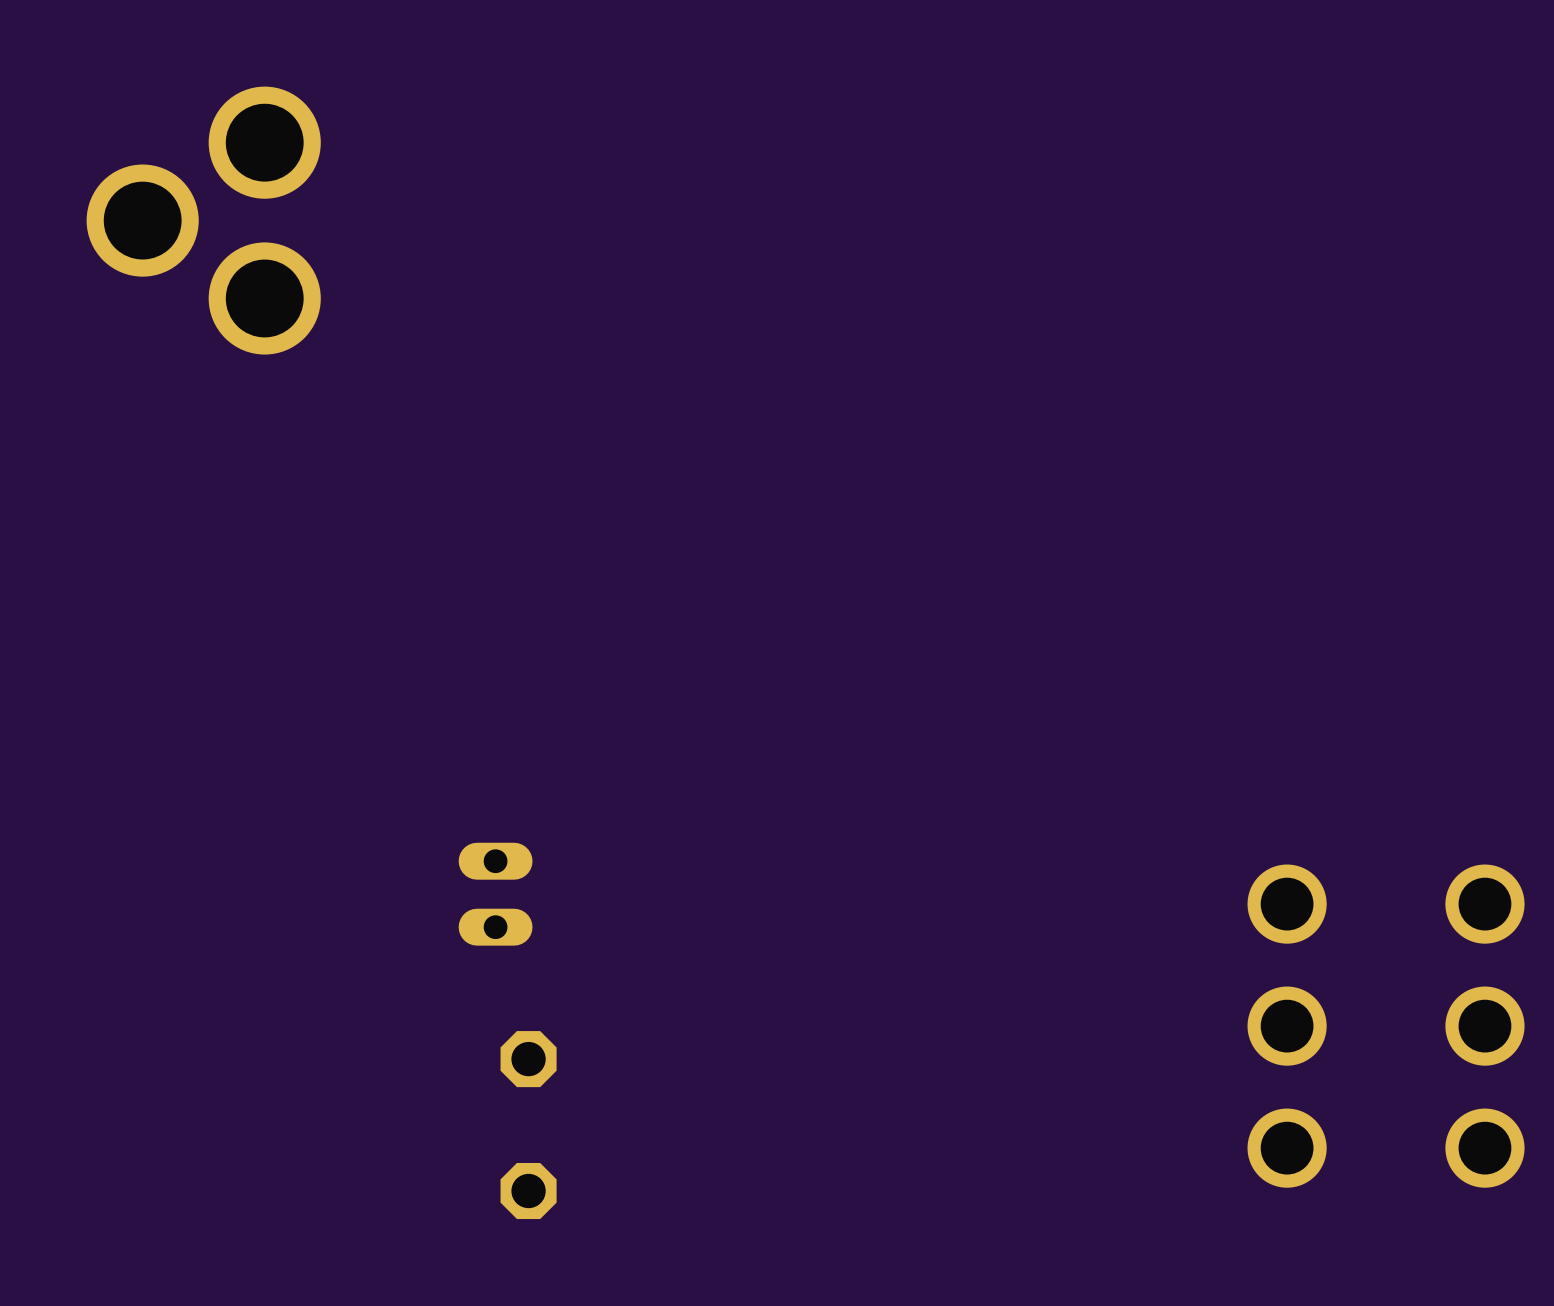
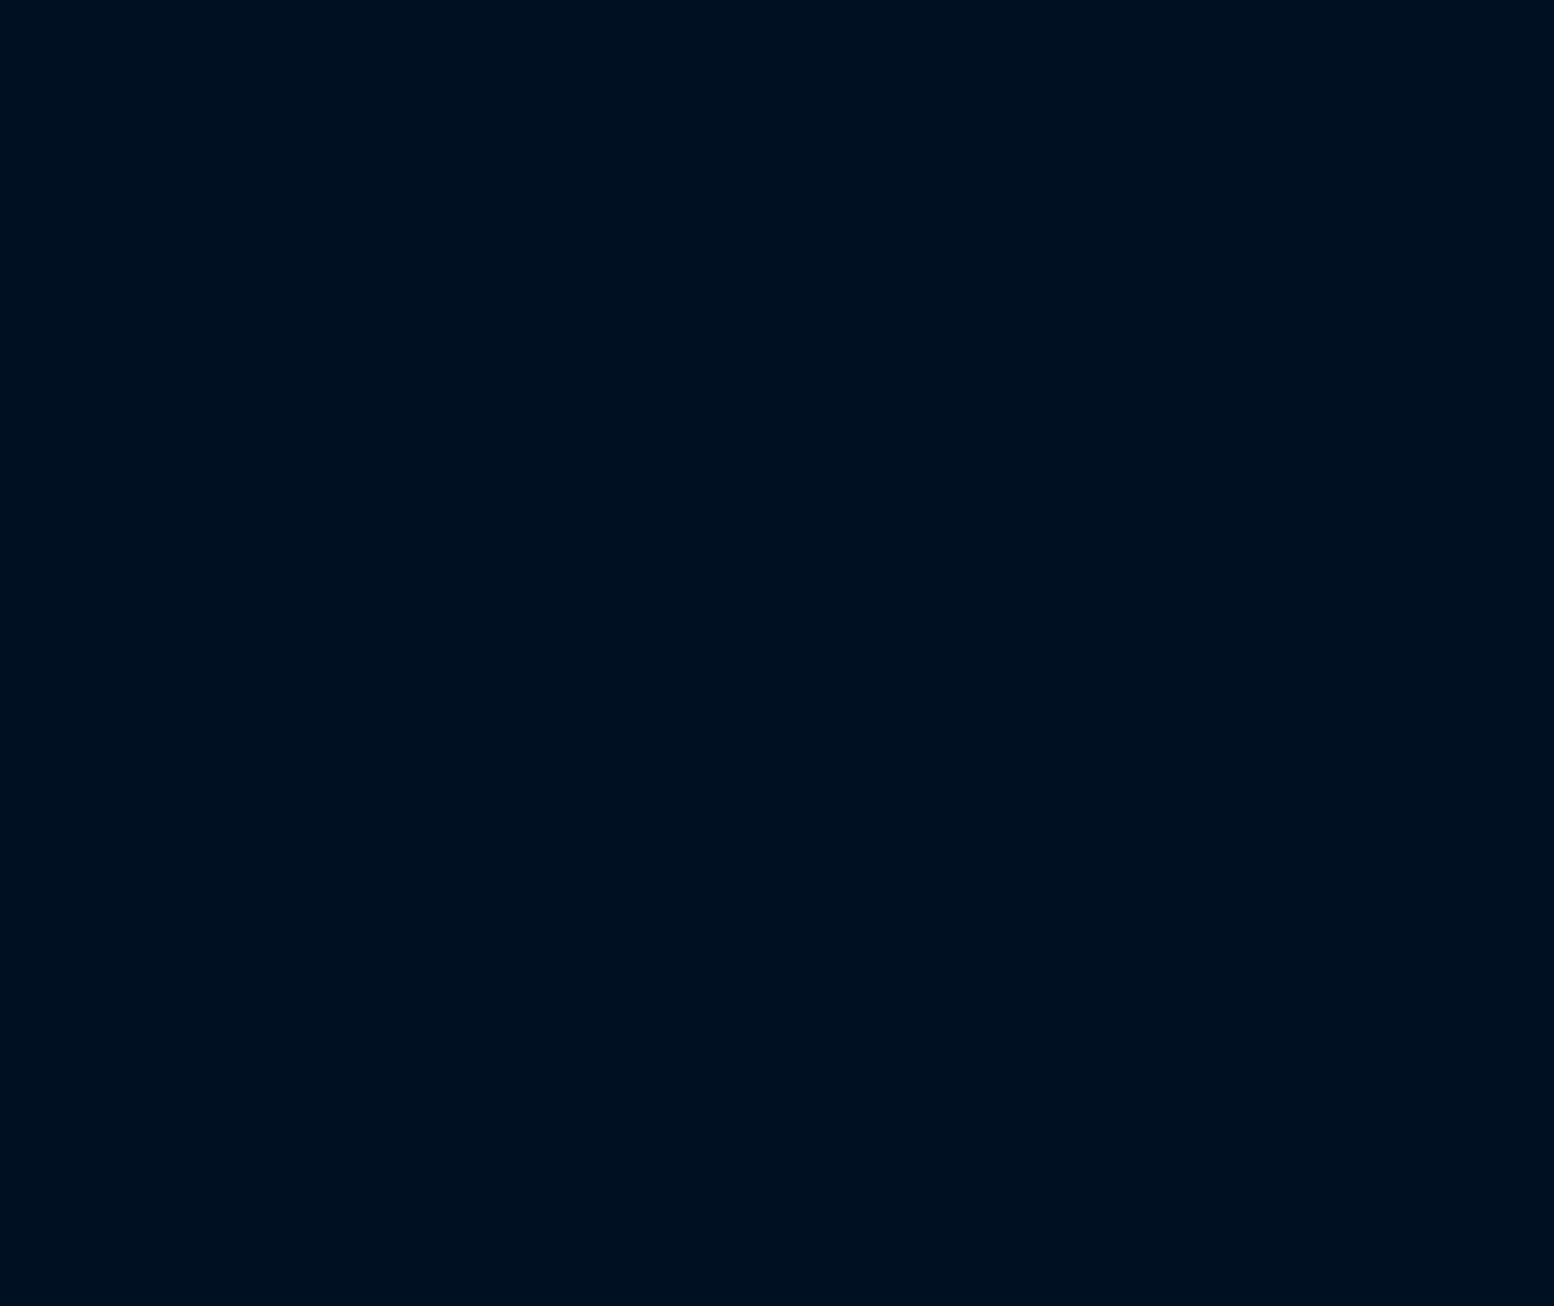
part: (203, 220) -> none
part: (495, 894) -> none
part: (1287, 1026) -> none
part: (1484, 1026) -> none
part: (528, 1059) -> none
part: (528, 1191) -> none

